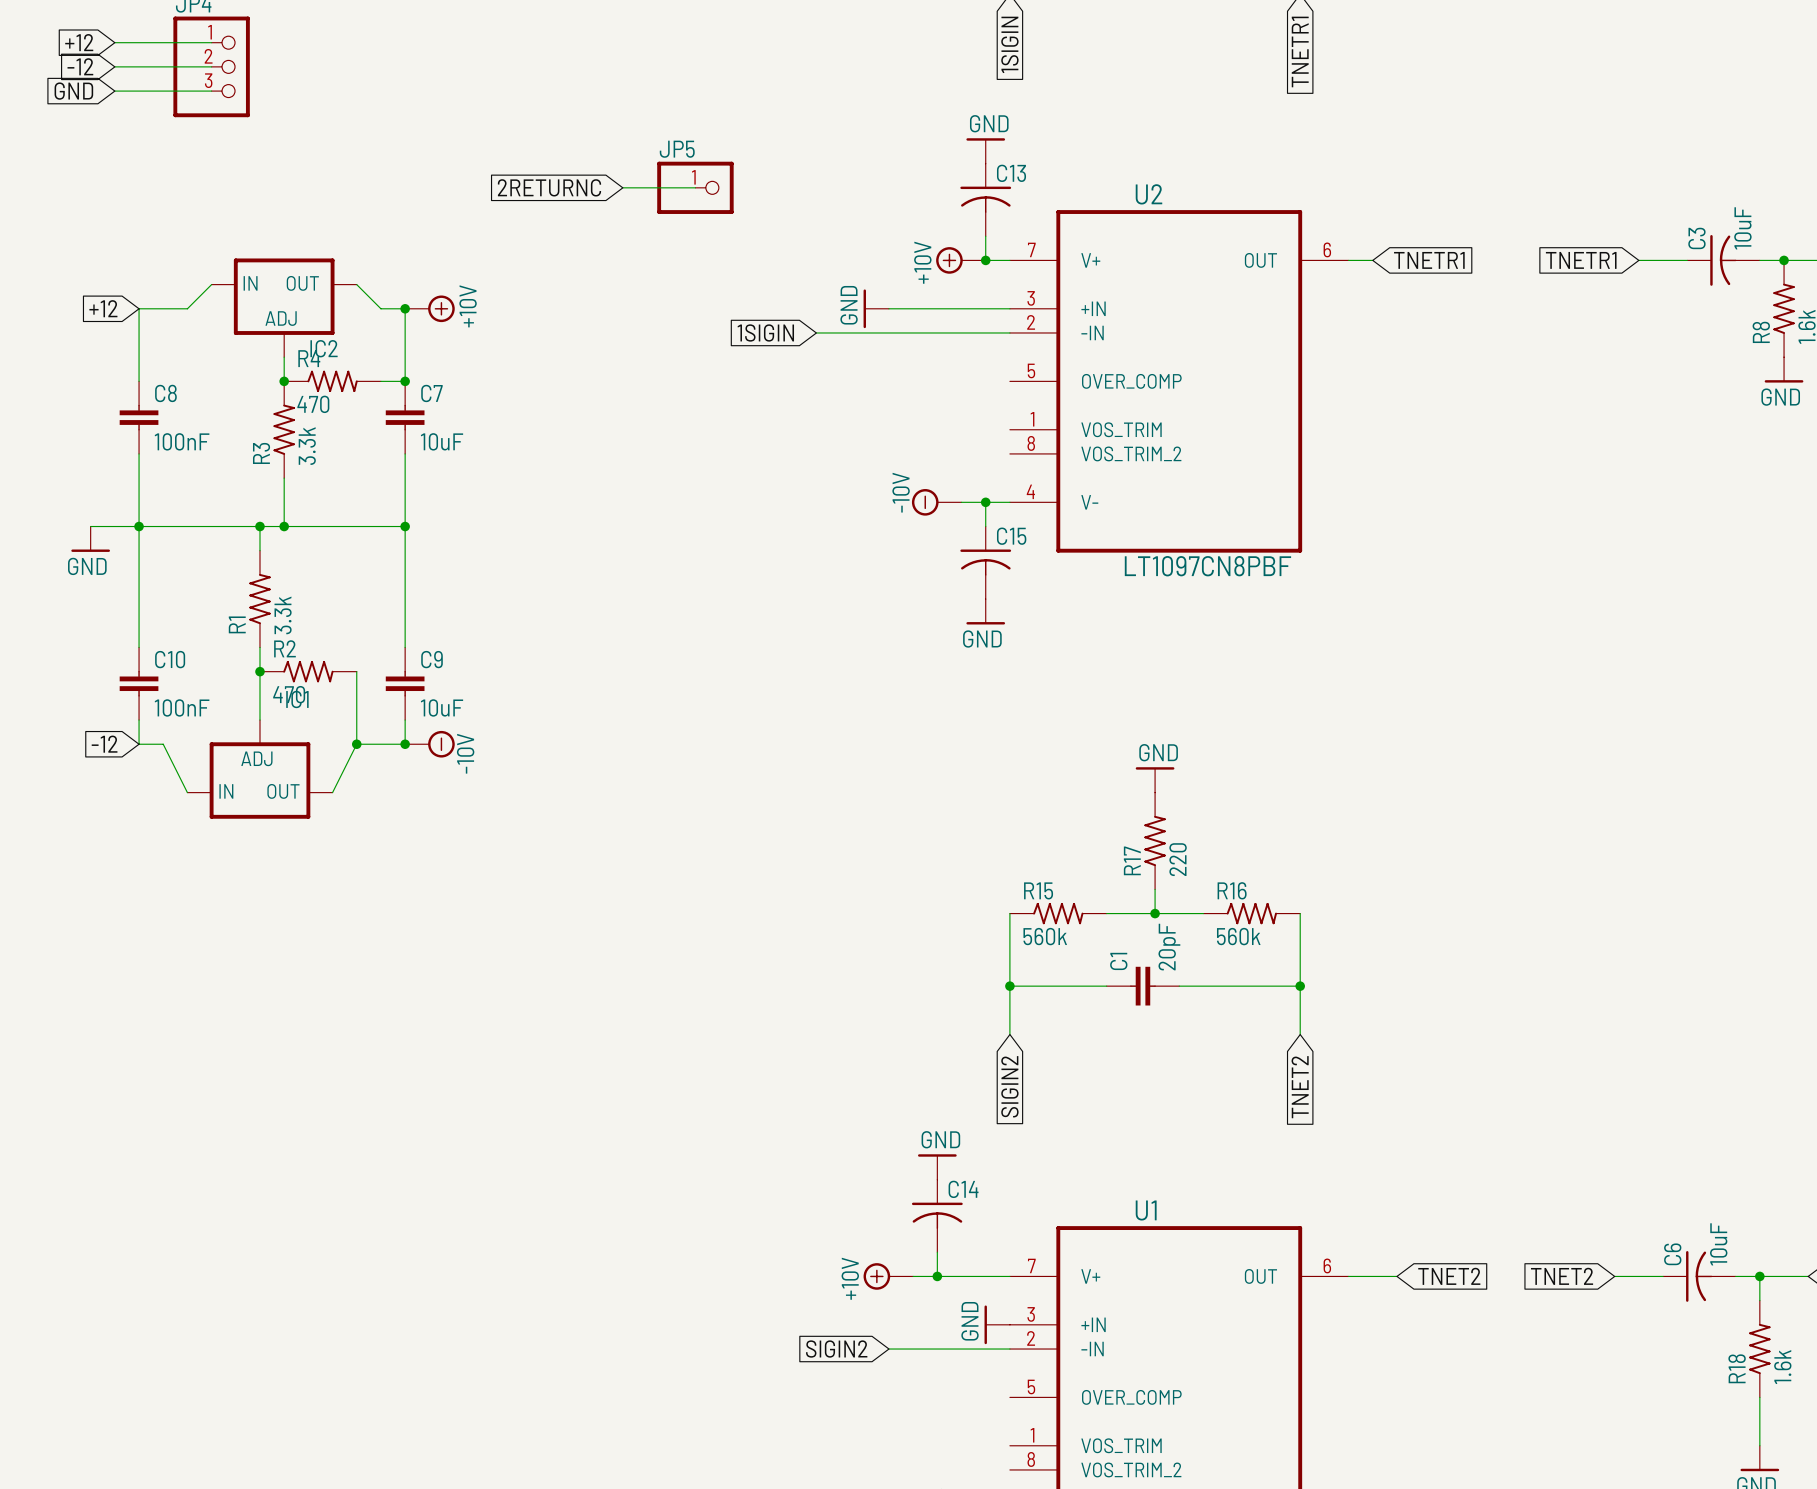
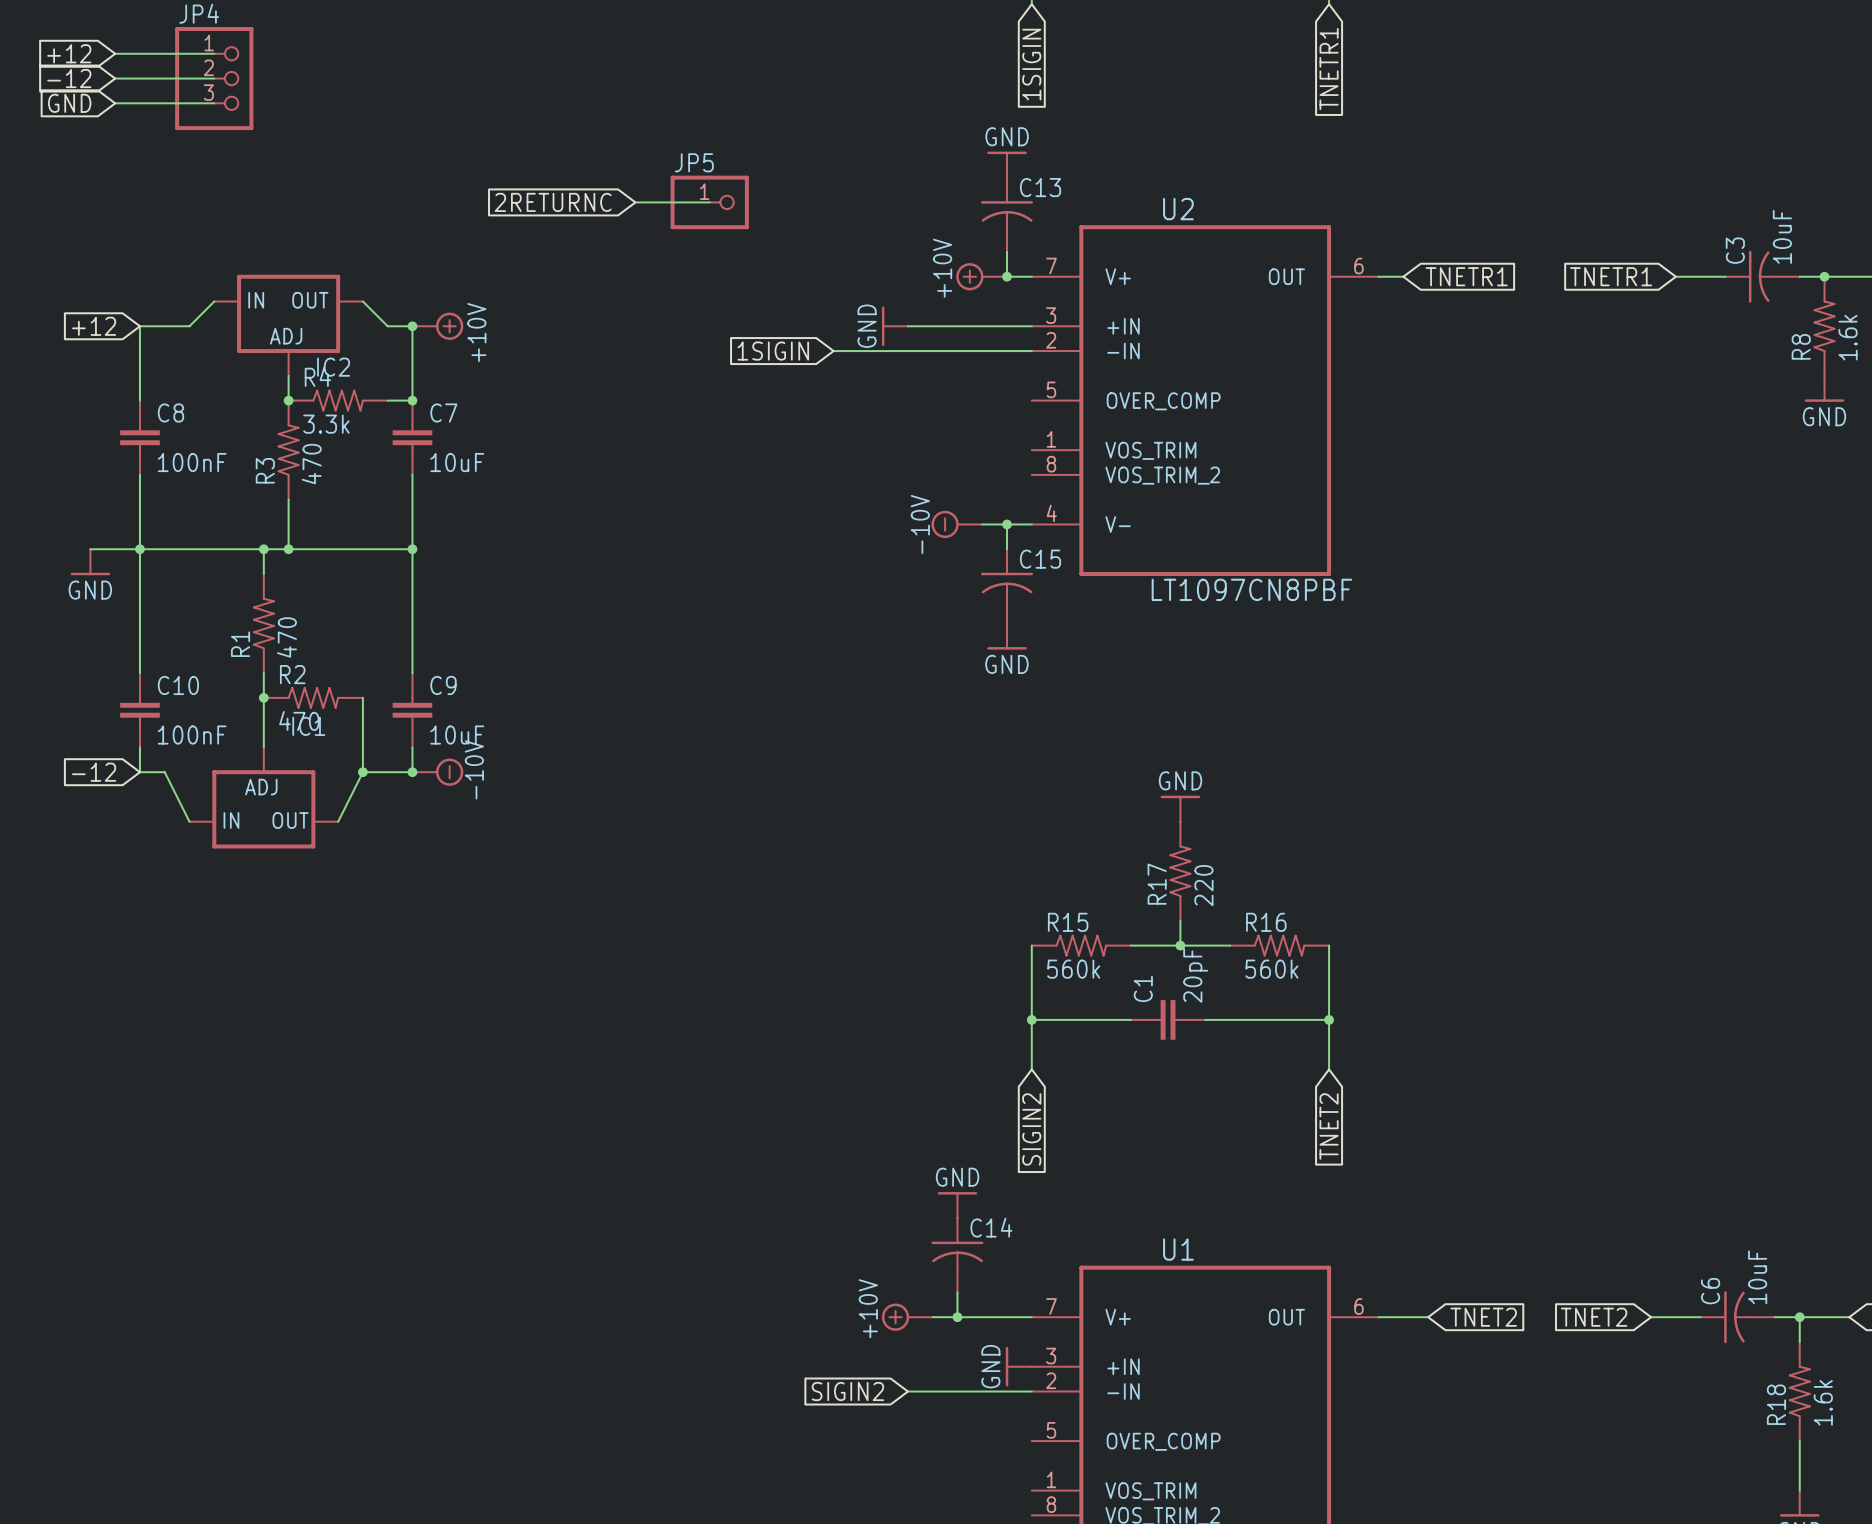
R4 value: 470 (313, 404) -> 3.3k (326, 424)
R3 value: 3.3k (307, 446) -> 470 (311, 464)
R1 value: 3.3k (283, 615) -> 470 (286, 637)

